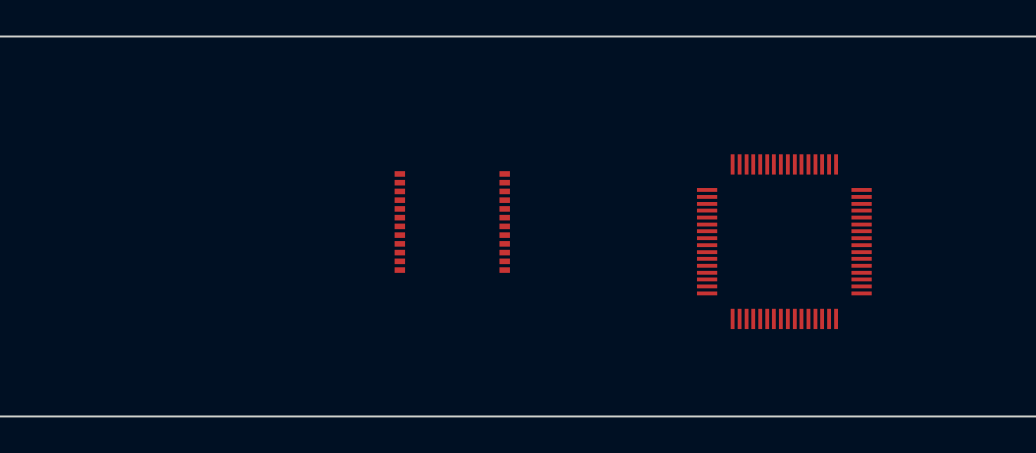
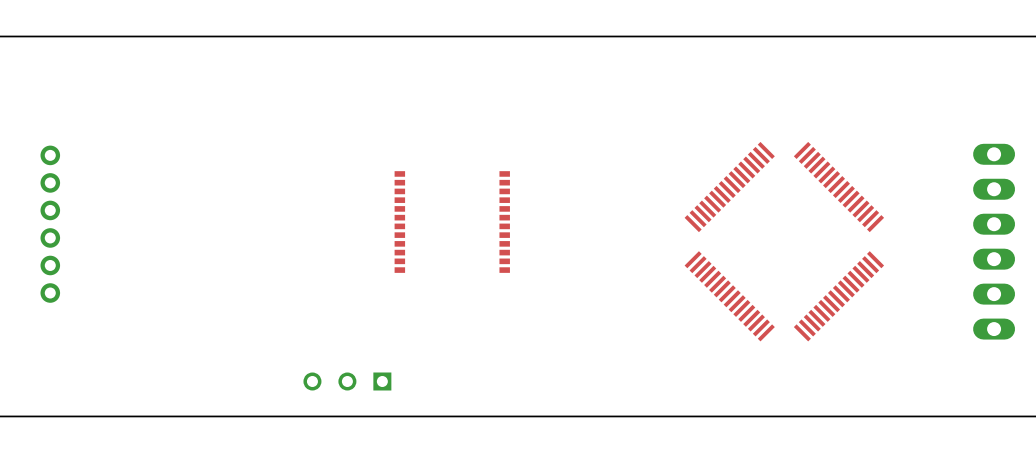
part: none -> (50, 224)
part rotation: 0° (784, 241) -> 45° clockwise (784, 241)
part: none -> (994, 241)
part: none -> (347, 381)

